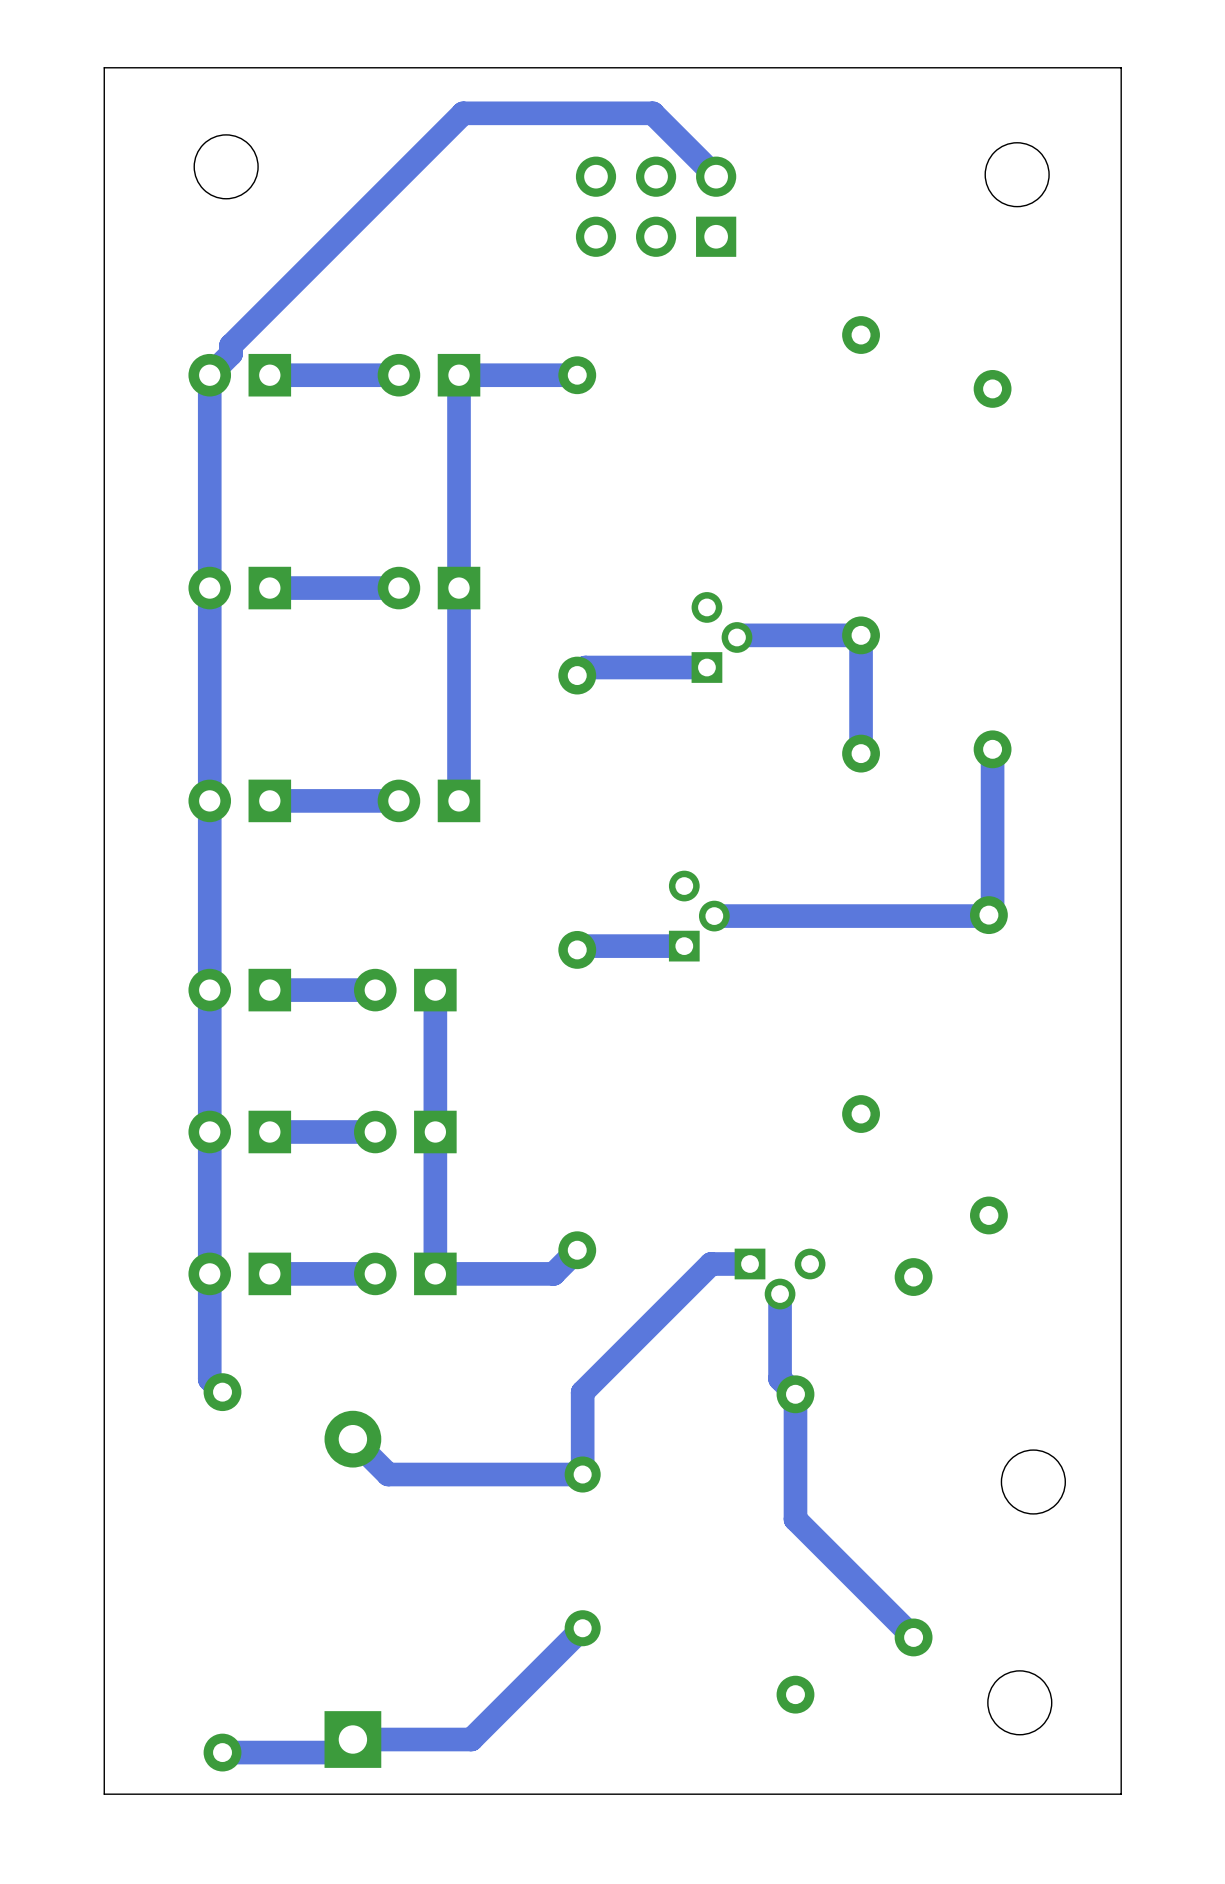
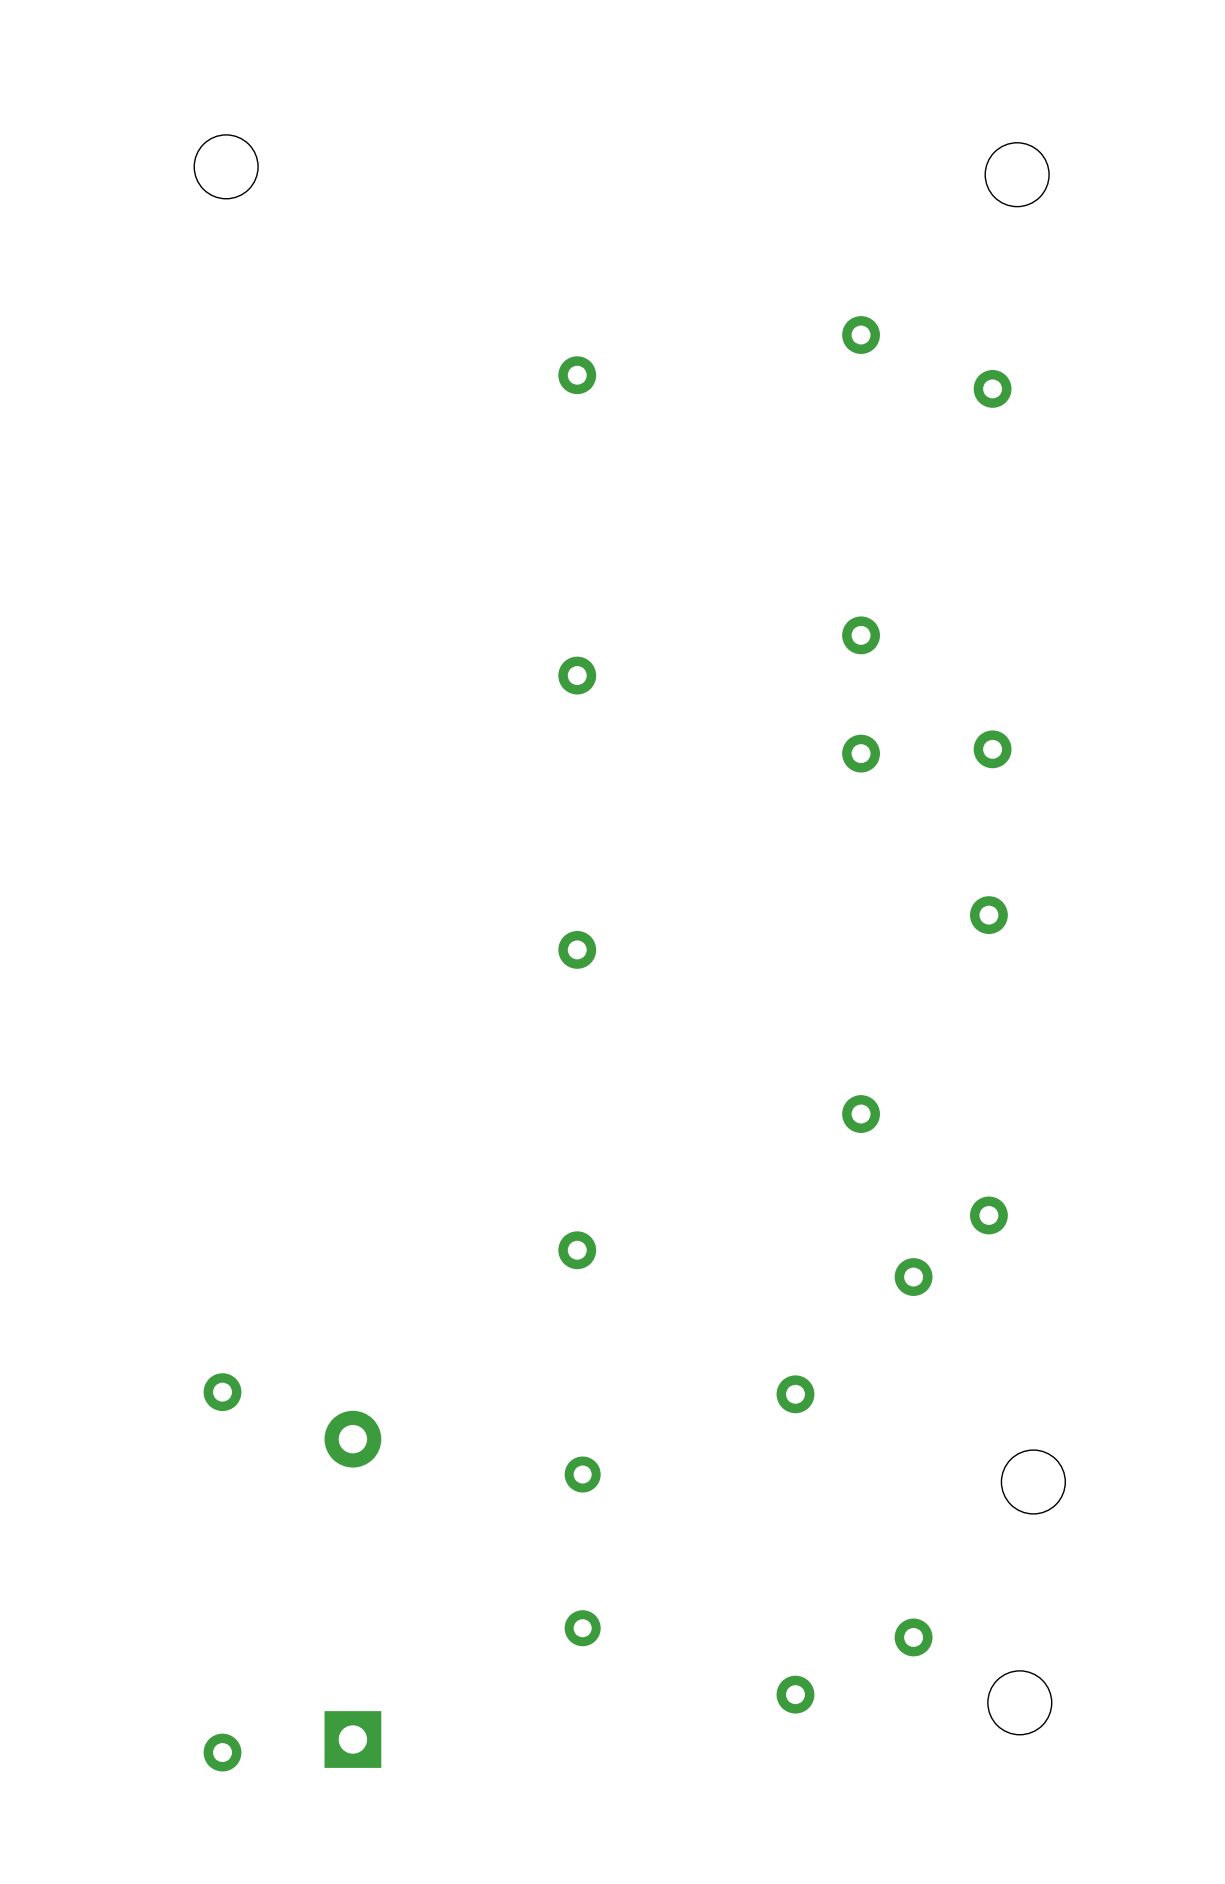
board edge: (1121, 67) (1121, 1794) (104, 1794) (104, 67) (1121, 67) -> none
track: (716, 176) (652, 113) (463, 113) (231, 345) (231, 353) (209, 375) (209, 1379) (222, 1392) -> none
part: (656, 206) -> none
part: (239, 375) -> none
track: (398, 375) (269, 375) -> none
part: (428, 375) -> none
track: (577, 375) (459, 375) (459, 800) -> none
part: (239, 588) -> none
track: (398, 588) (269, 588) -> none
part: (428, 588) -> none
part: (721, 637) -> none
track: (736, 637) (739, 635) (861, 635) (861, 753) -> none
track: (706, 667) (585, 667) (577, 675) -> none
track: (992, 749) (992, 911) (987, 916) (714, 916) -> none
part: (239, 800) -> none
track: (398, 800) (269, 800) -> none
part: (428, 800) -> none
part: (699, 916) -> none
track: (684, 946) (581, 946) (577, 949) -> none
part: (239, 990) -> none
track: (375, 990) (269, 990) -> none
part: (405, 990) -> none
track: (435, 990) (435, 1273) (553, 1273) (577, 1250) -> none
part: (239, 1132) -> none
track: (375, 1132) (269, 1132) -> none
part: (405, 1132) -> none
track: (750, 1264) (711, 1264) (582, 1392) (582, 1474) (388, 1474) (352, 1439) -> none
part: (239, 1273) -> none
track: (375, 1273) (269, 1273) -> none
part: (405, 1273) -> none
part: (780, 1279) -> none
track: (780, 1294) (780, 1378) (795, 1394) (795, 1519) (913, 1637) -> none
track: (582, 1628) (471, 1739) (352, 1739) (339, 1752) (222, 1752) -> none

